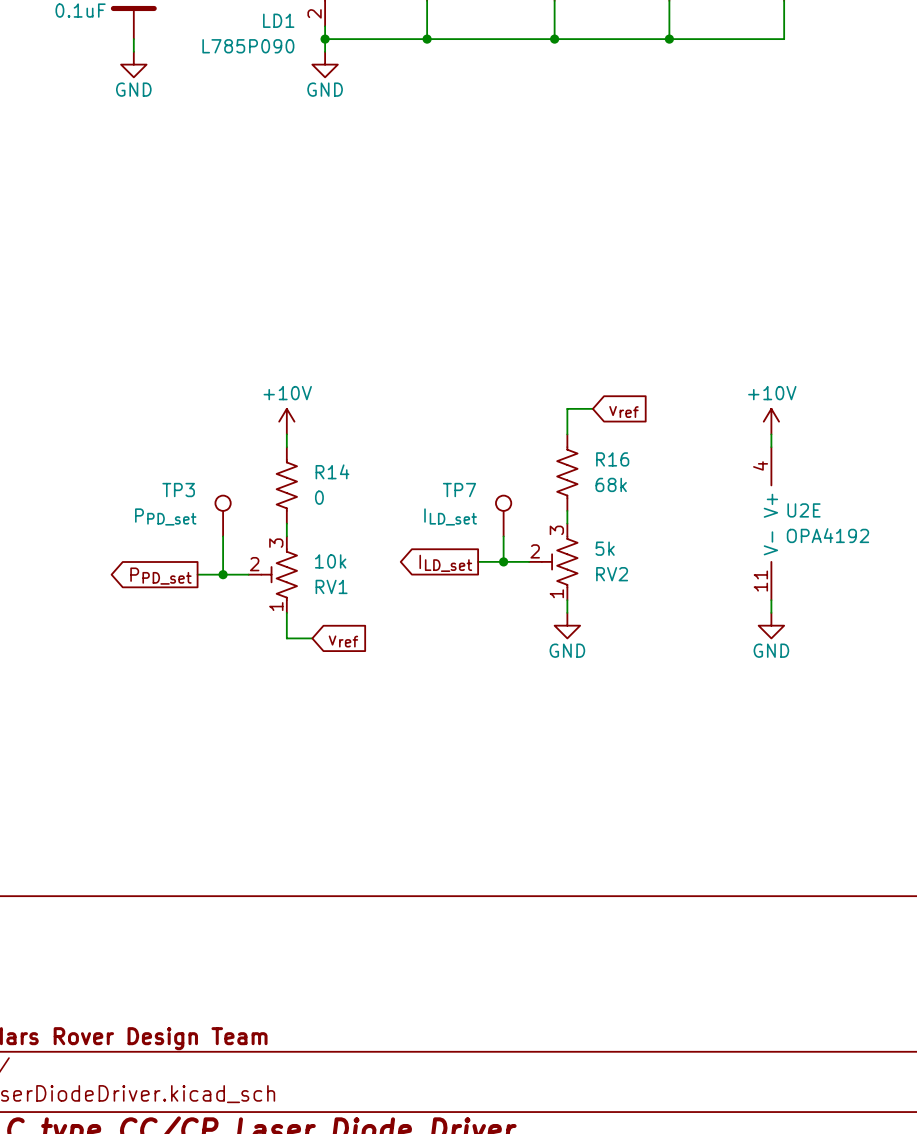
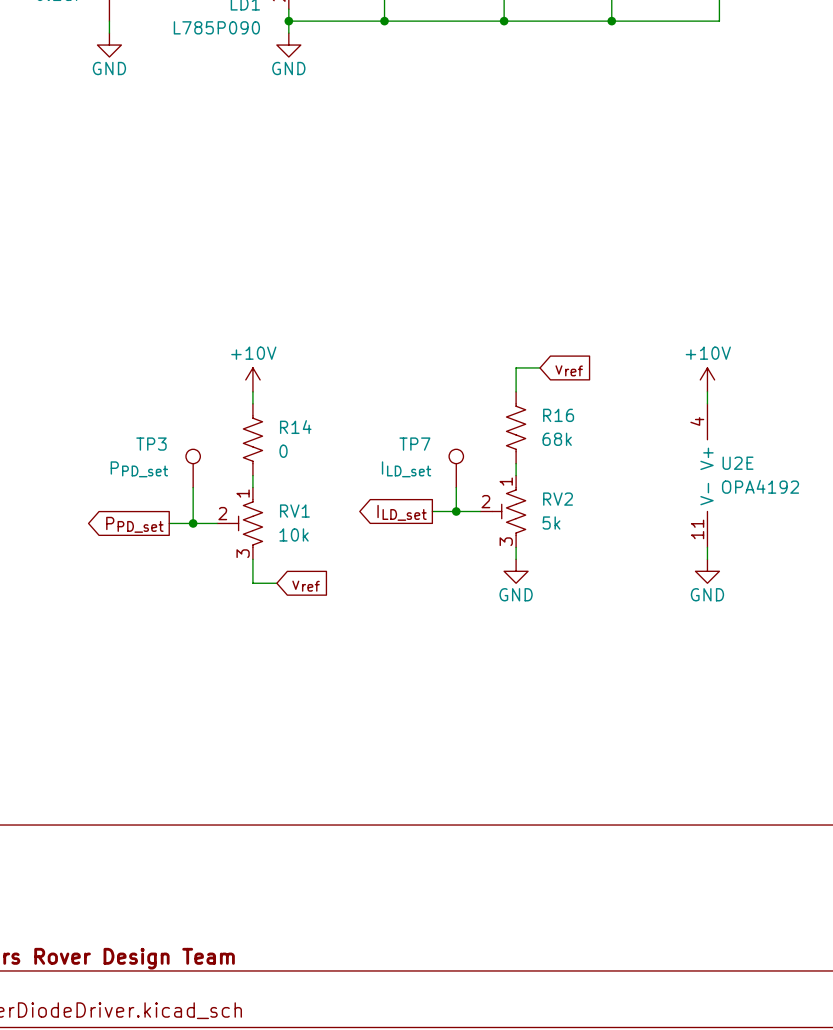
RV2 flip: as is (559, 561) -> up-down (508, 511)
RV1 flip: as is (279, 574) -> up-down (245, 523)

